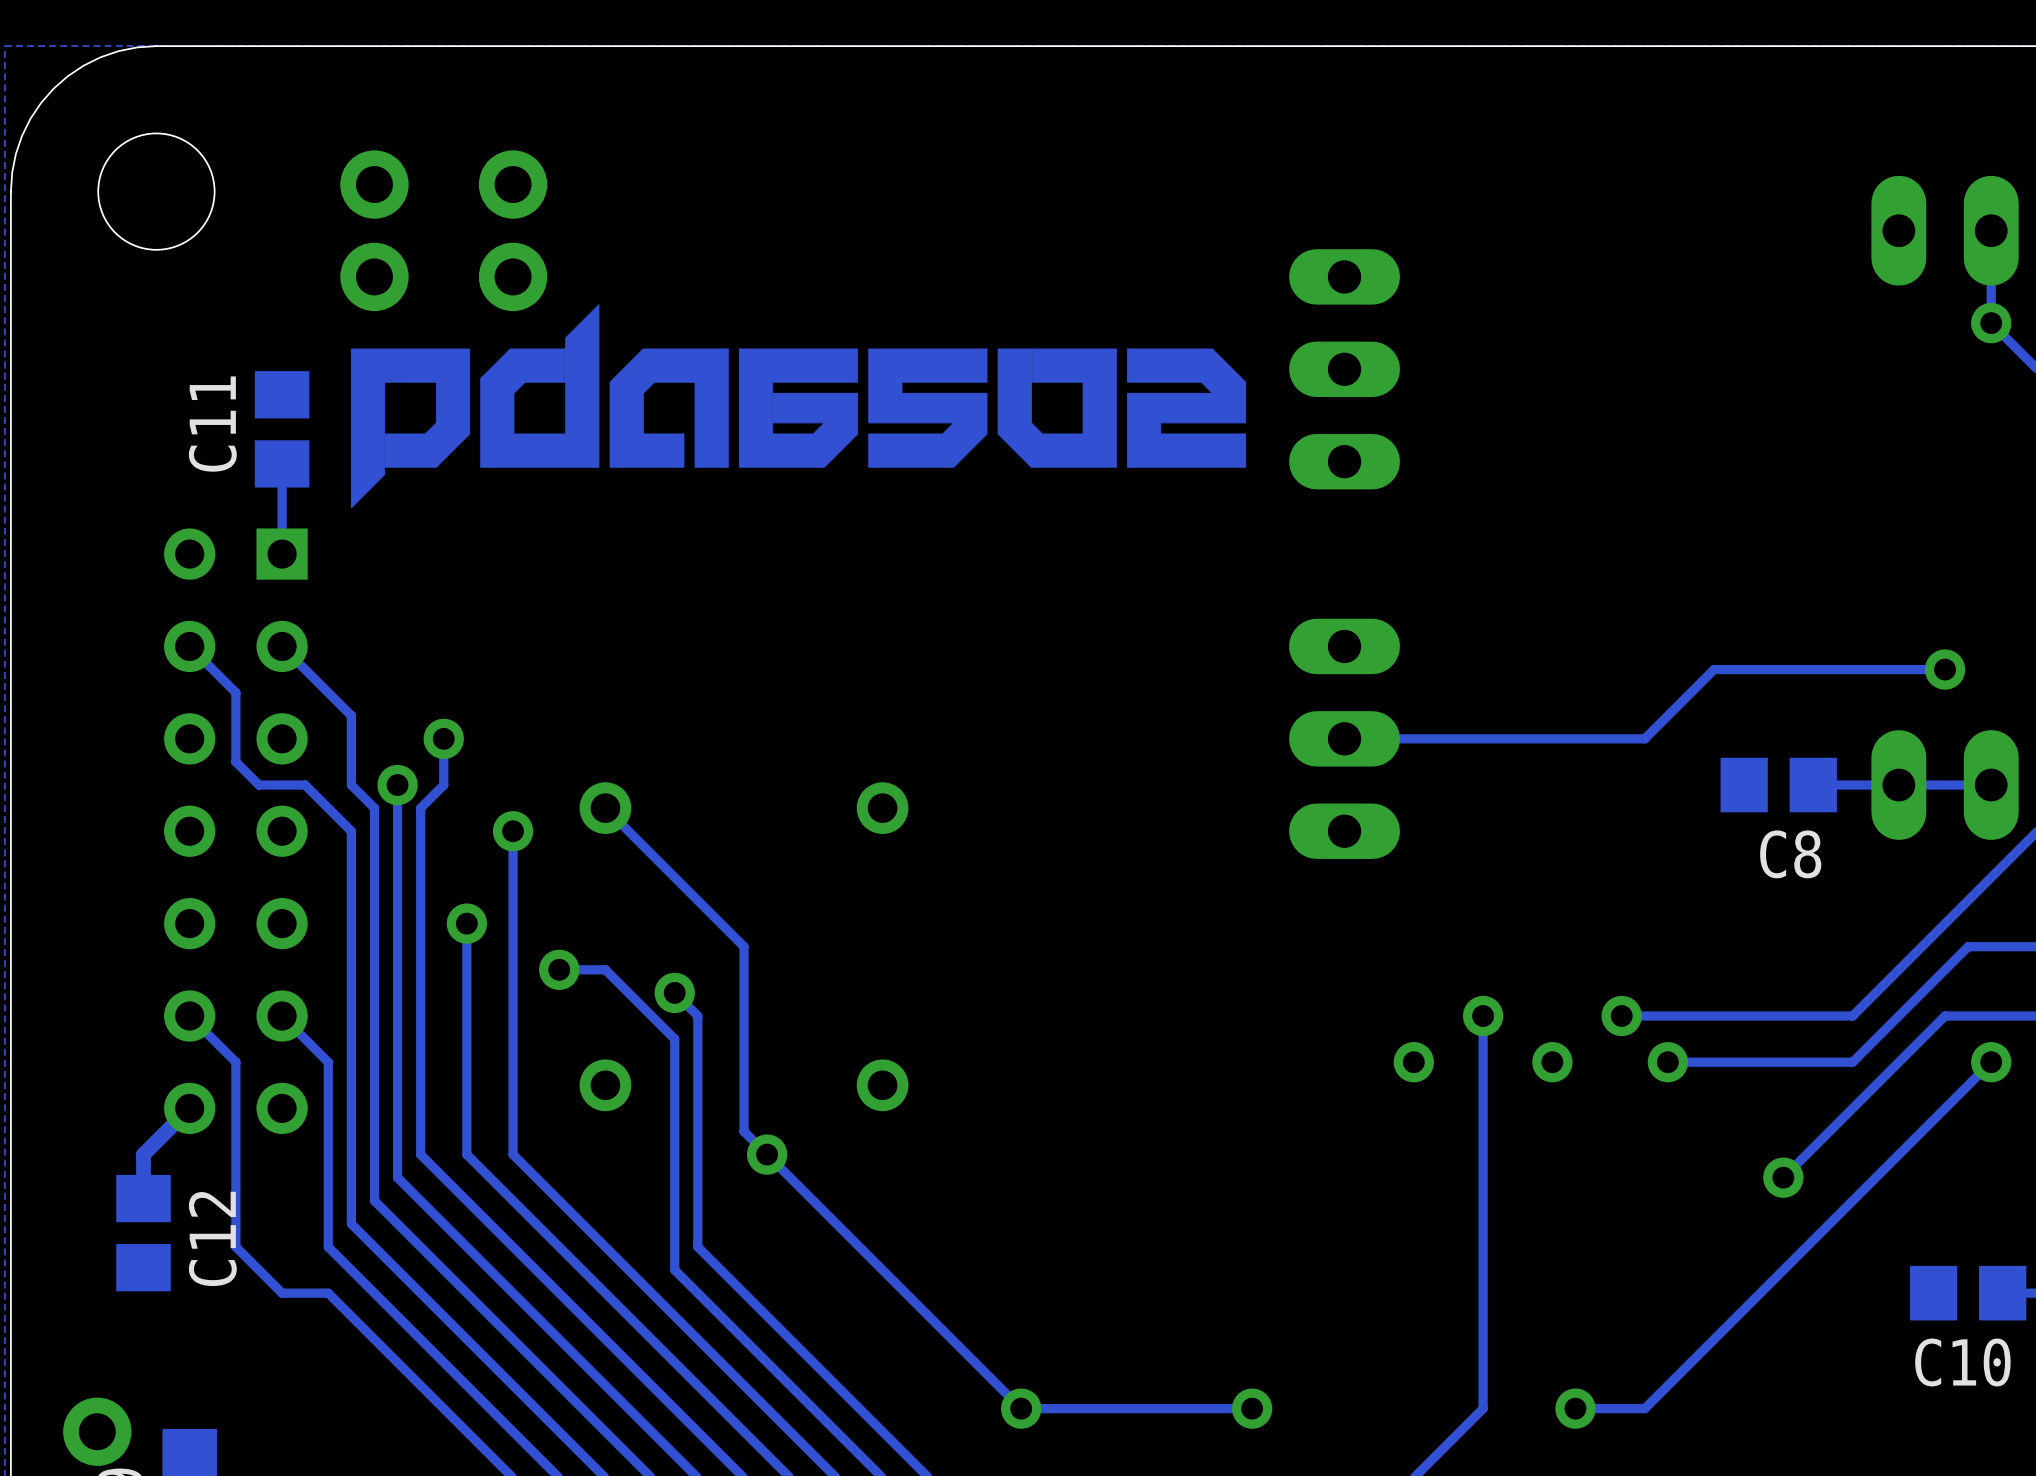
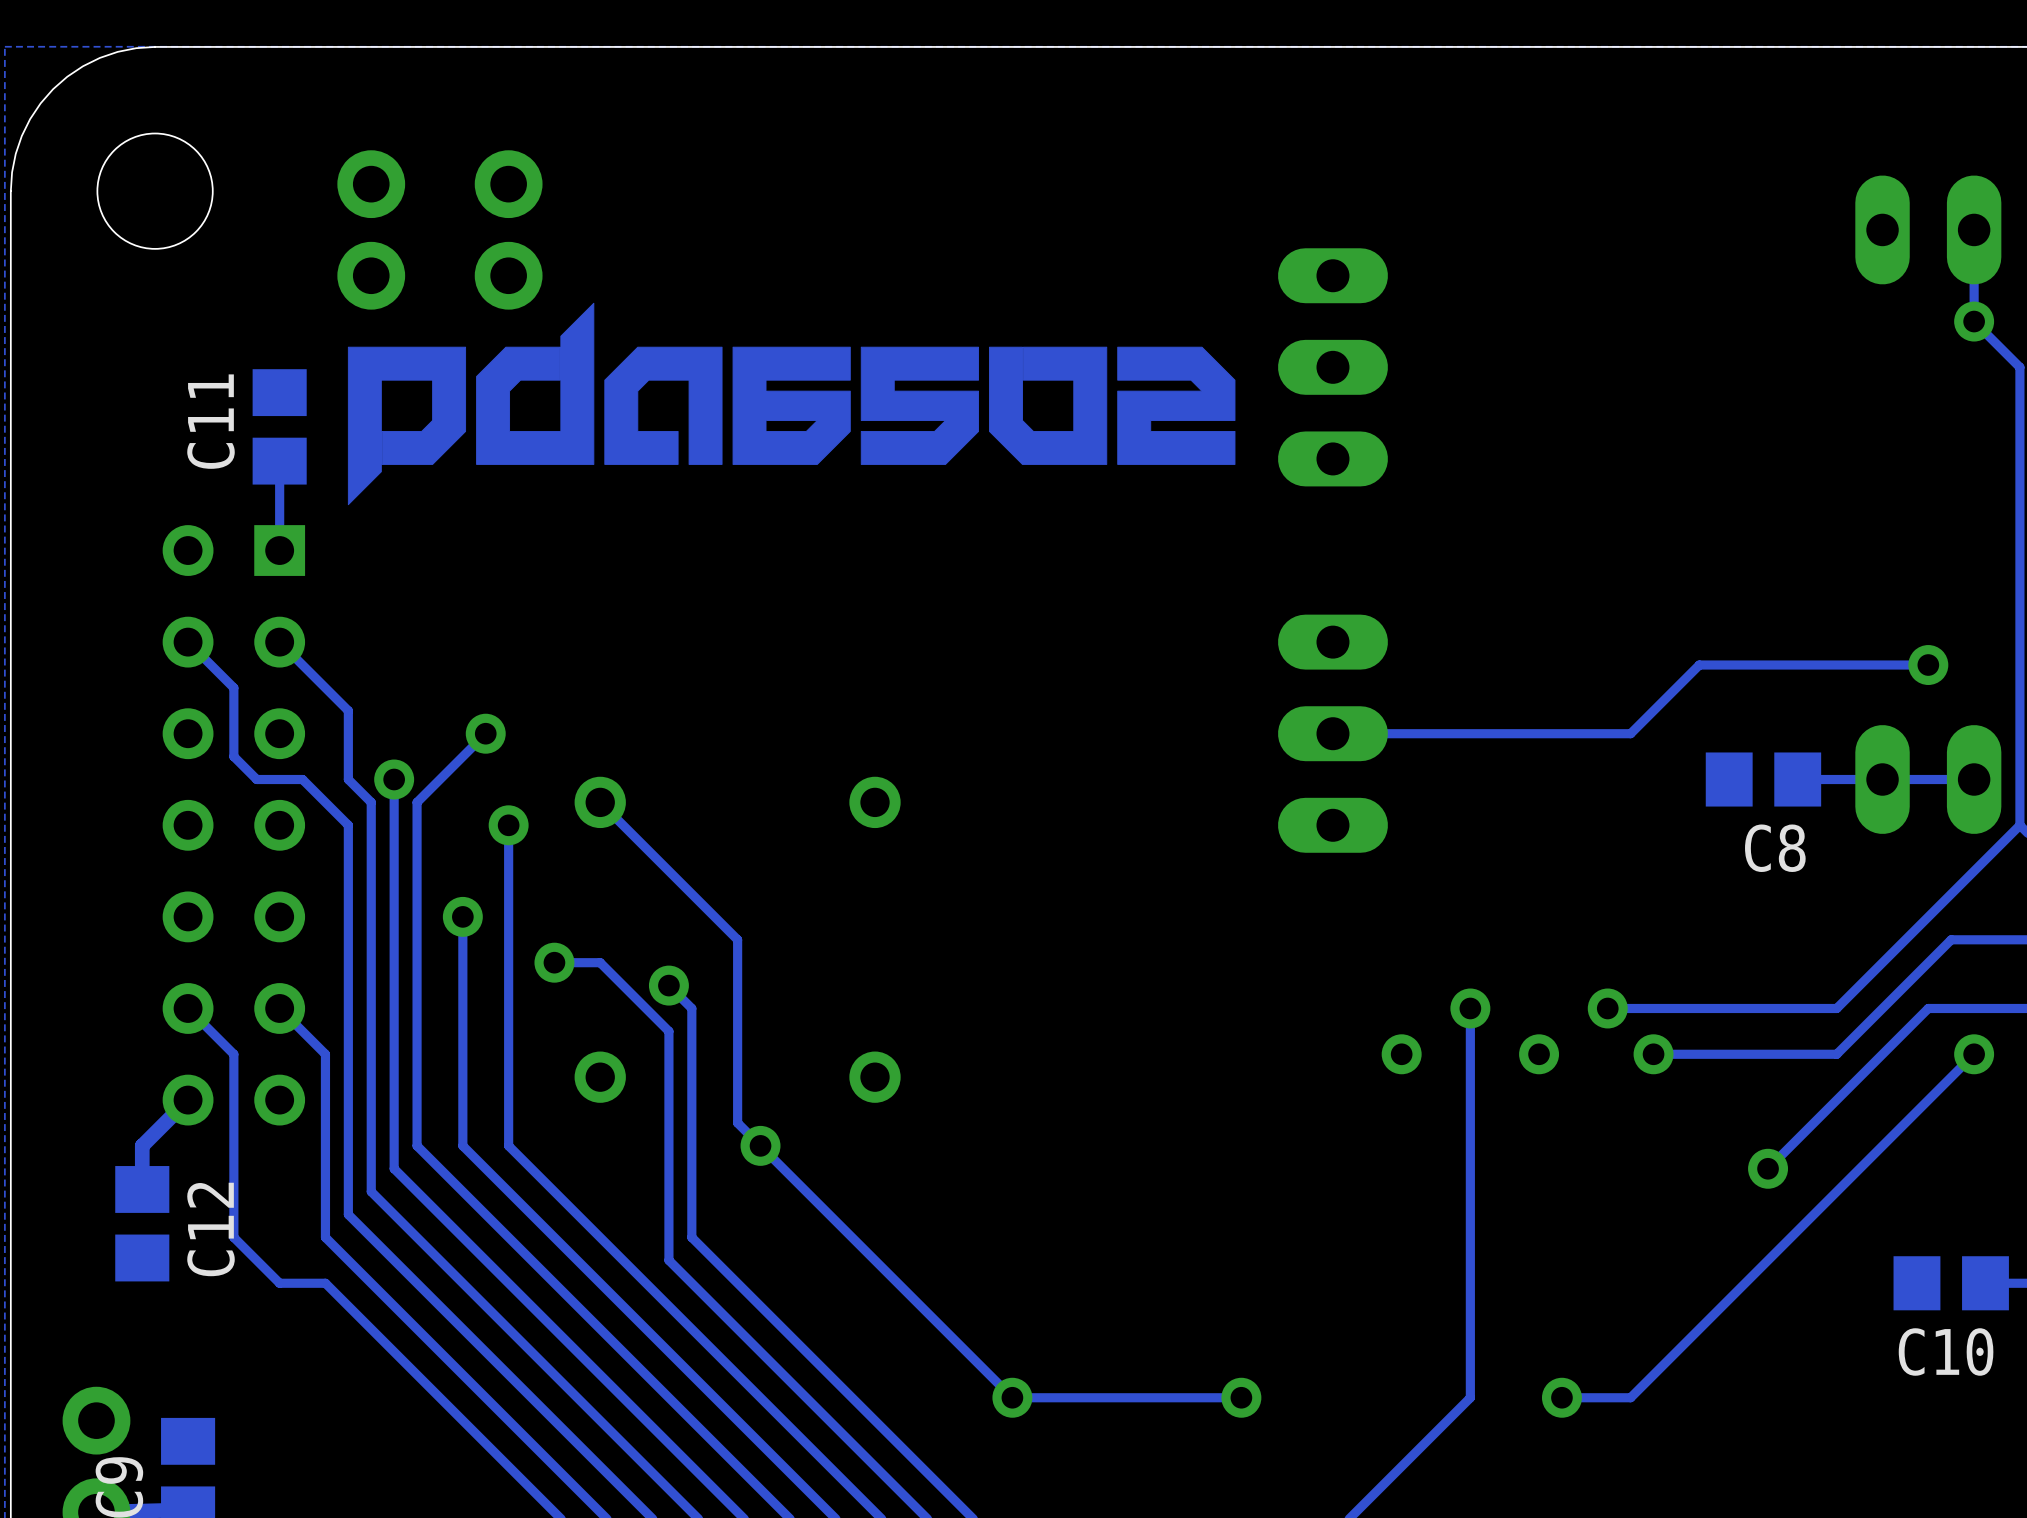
track: (443, 738) (443, 785) -> (485, 733) (439, 779)
via position: (443, 738) -> (485, 733)

